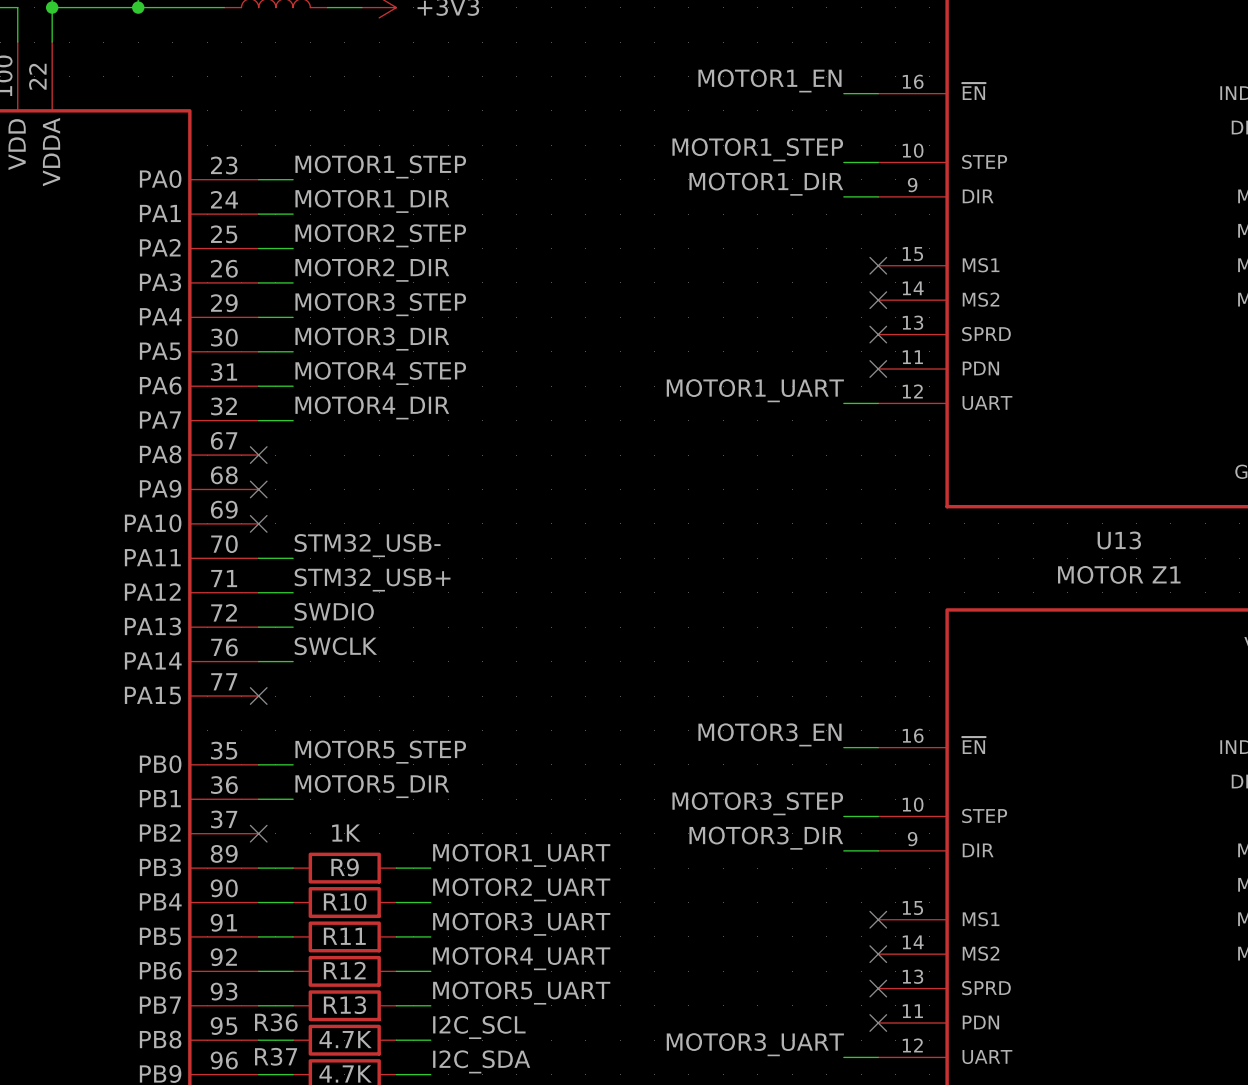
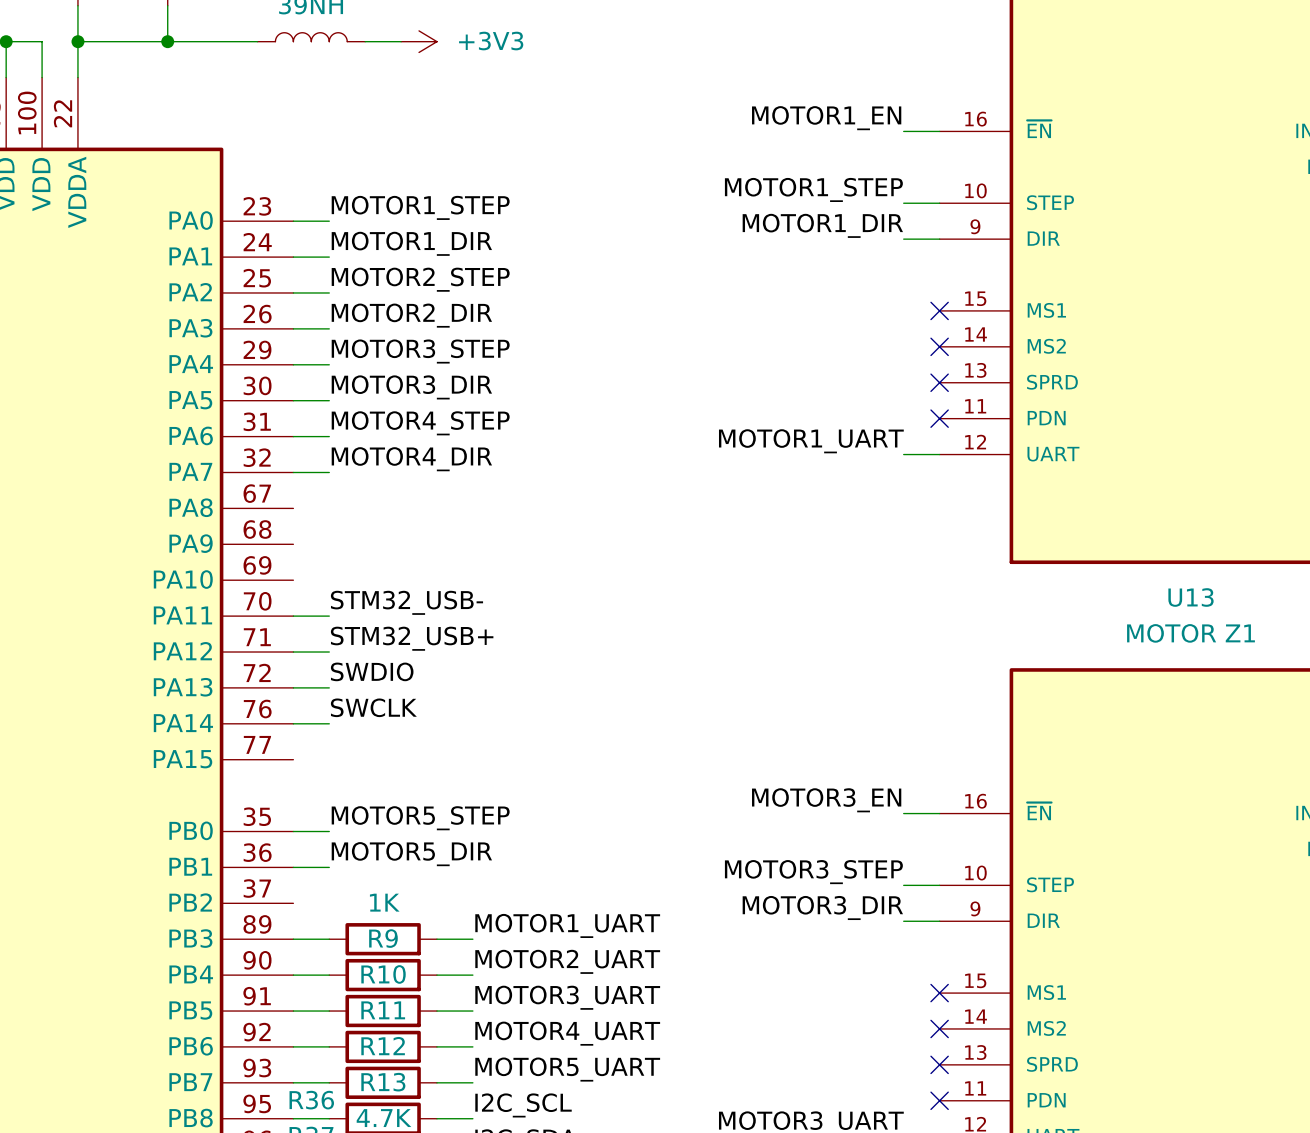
no-connect mark: (258, 455) -> none
no-connect mark: (258, 489) -> none
no-connect mark: (258, 523) -> none
no-connect mark: (258, 696) -> none
no-connect mark: (258, 833) -> none

